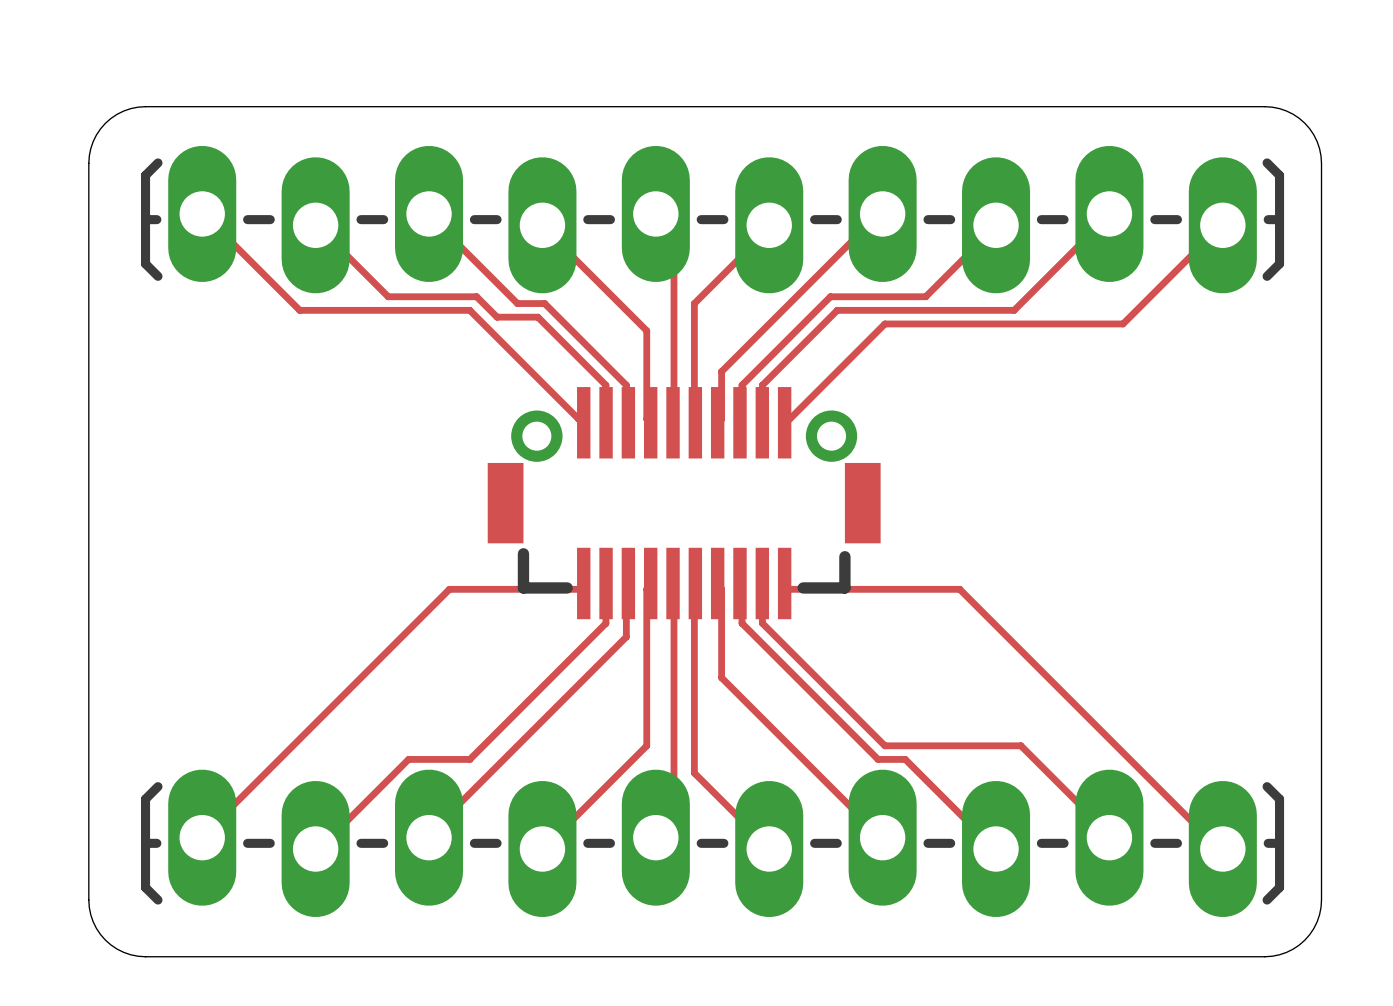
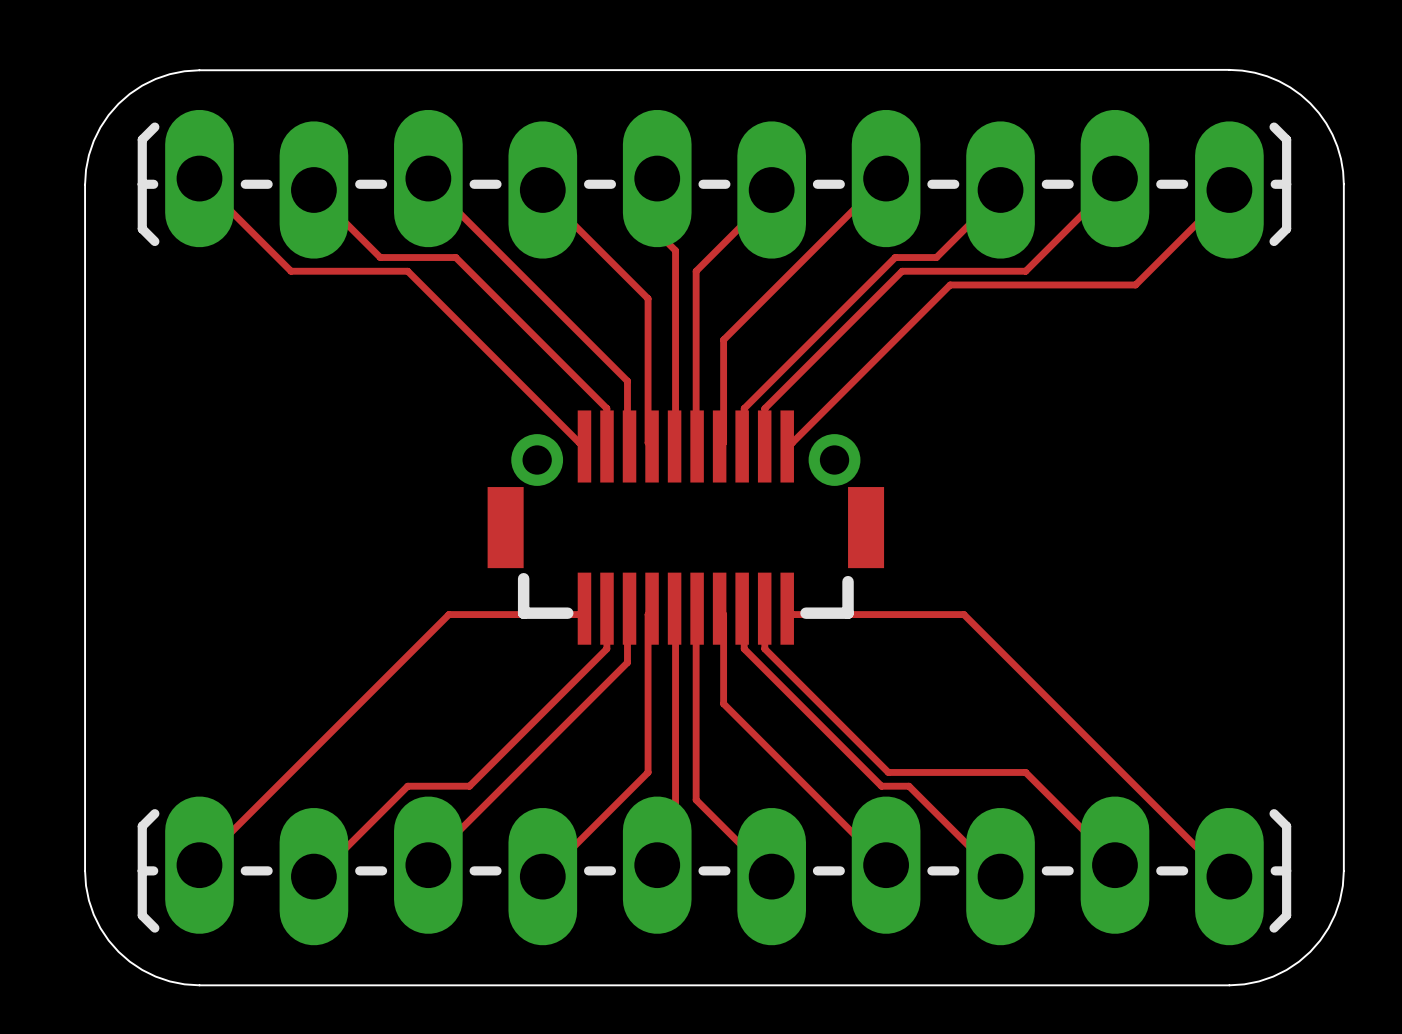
board edge: (88, 163) (93, 141) (105, 123) (123, 110) (145, 106) (1264, 106) (1279, 108) (1299, 118) (1313, 135) (1319, 148) (1321, 163) (1321, 907) (1313, 928) (1304, 940) (1293, 949) (1272, 956) (1222, 956) -> (85, 184) (86, 169) (93, 140) (108, 115) (129, 93) (142, 85) (155, 79) (184, 71) (1229, 69) (1267, 76) (1290, 87) (1310, 103) (1326, 123) (1337, 146) (1343, 171) (1342, 885) (1335, 914) (1320, 940) (1310, 951) (1299, 961) (1273, 976) (1259, 981) (1229, 985)
track: (202, 213) (299, 310) (469, 310) -> (199, 178) (291, 271) (407, 271) (469, 333)
track: (429, 213) (517, 303) (544, 303) (626, 385) -> (428, 178) (428, 181) (627, 381) (627, 408)
track: (882, 213) (878, 215) (721, 371) -> (886, 178) (723, 339) (723, 394)
track: (1109, 213) (1014, 310) (837, 310) -> (1114, 178) (1114, 181) (1025, 271) (902, 271) (840, 333)
part position: (712, 219) -> (714, 184)
track: (315, 225) (388, 296) (476, 296) (497, 317) (537, 317) -> (313, 190) (380, 257) (455, 257) (538, 339)
track: (542, 225) (646, 330) -> (542, 190) (545, 195) (648, 298) (648, 353)
track: (769, 225) (769, 228) (694, 303) -> (771, 190) (771, 195) (696, 271) (696, 326)
track: (996, 225) (925, 296) (830, 296) -> (1000, 190) (998, 195) (936, 257) (895, 257) (833, 319)
track: (1222, 225) (1123, 323) (884, 323) -> (1229, 190) (1135, 284) (950, 284) (888, 346)
board edge: (88, 843) (89, 907) (96, 928) (105, 940) (117, 949) (138, 956) (202, 956) -> (85, 870) (88, 900) (93, 914) (108, 940) (118, 951) (129, 961) (155, 976) (169, 981) (199, 985)

